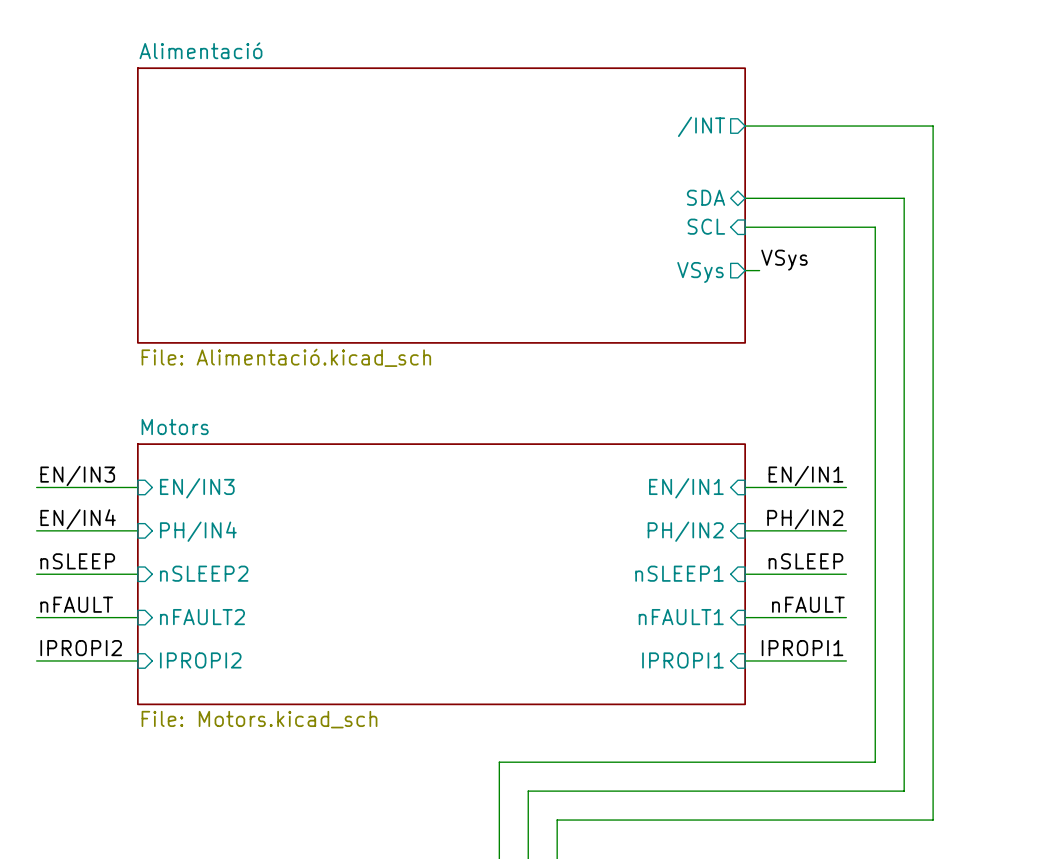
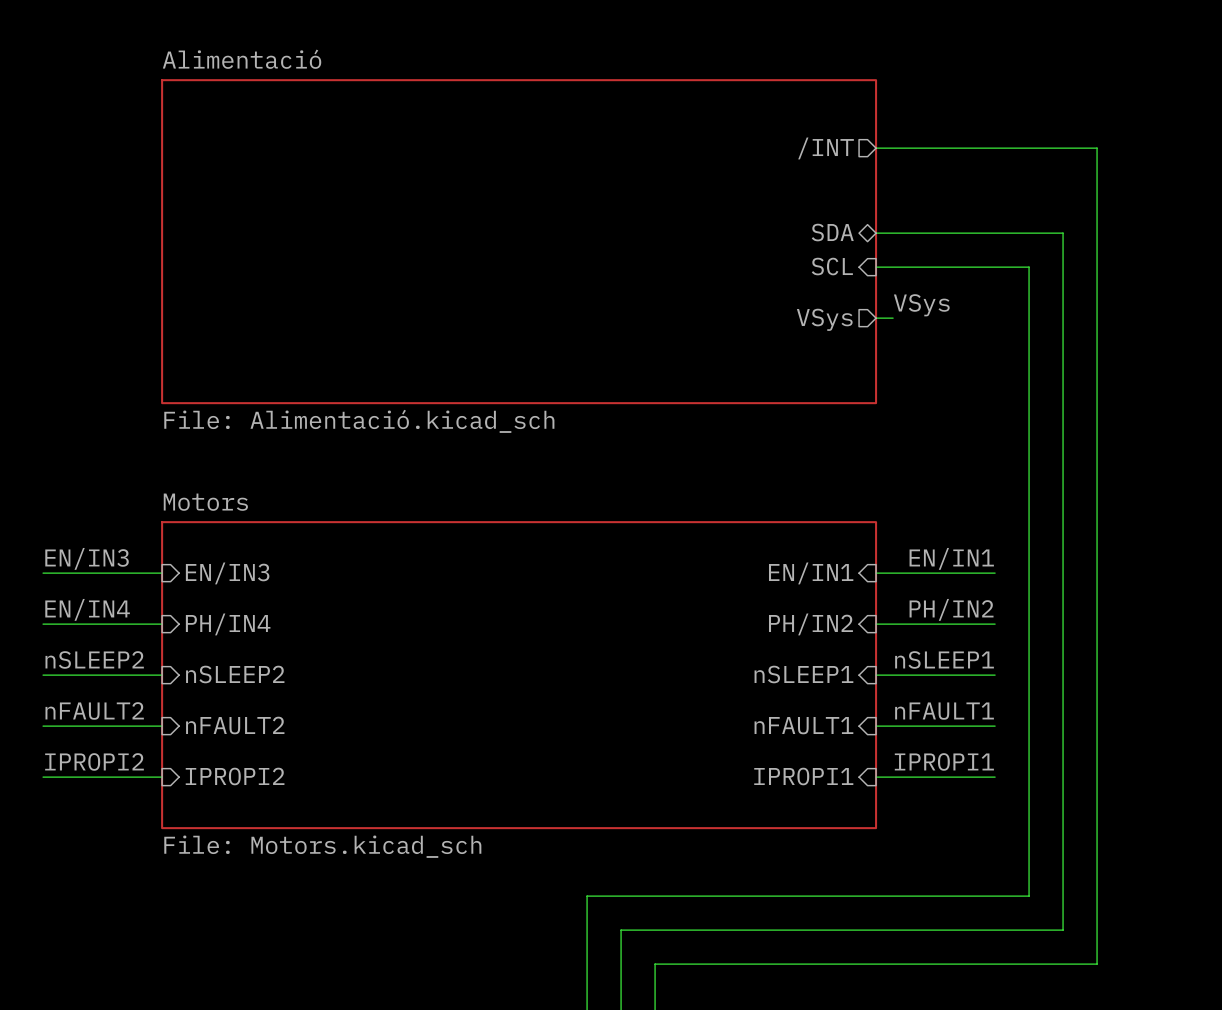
label: nSLEEP (77, 561) -> nSLEEP2 (94, 659)
label: nSLEEP (805, 561) -> nSLEEP1 (944, 659)
label: nFAULT (76, 604) -> nFAULT2 (94, 710)
label: nFAULT (808, 604) -> nFAULT1 (944, 711)

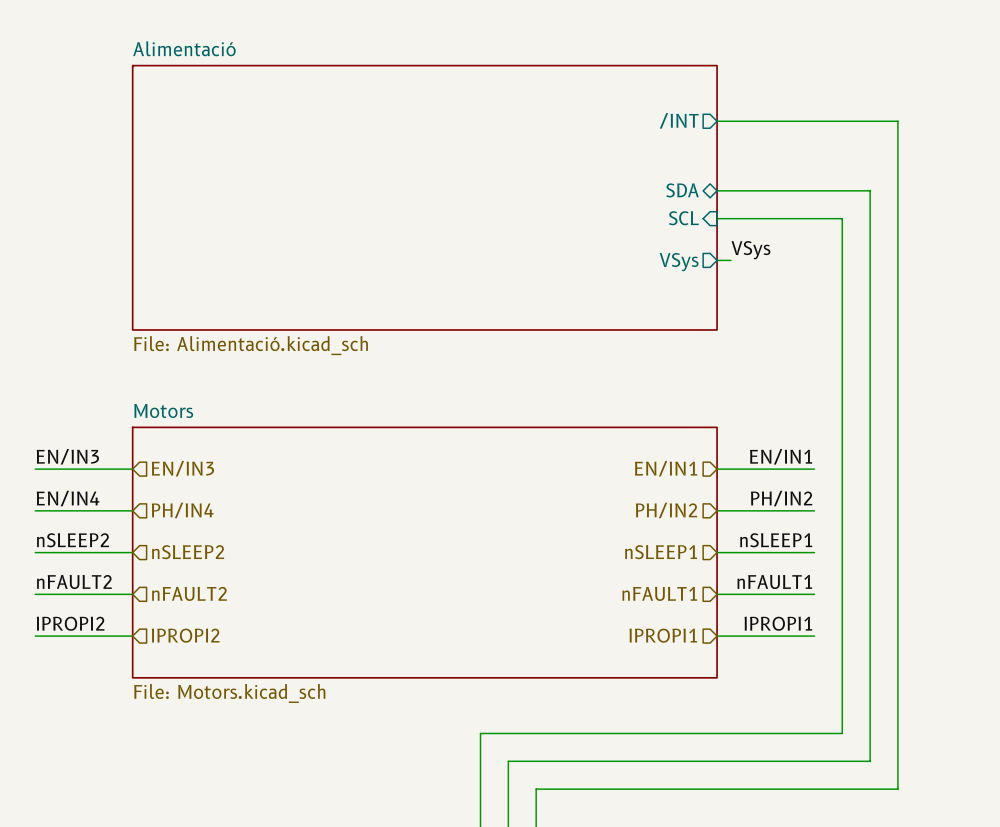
sheet pin: EN/IN3 (227, 573) -> none
hierarchical label: none -> EN/IN3 (182, 468)
sheet pin: EN/IN1 (811, 573) -> none
hierarchical label: none -> EN/IN1 (666, 468)
sheet pin: PH/IN4 (228, 624) -> none
hierarchical label: none -> PH/IN4 (182, 510)
sheet pin: PH/IN2 (810, 624) -> none
hierarchical label: none -> PH/IN2 (666, 510)
sheet pin: nSLEEP2 (235, 674) -> none
hierarchical label: none -> nSLEEP2 (188, 552)
sheet pin: nSLEEP1 (803, 674) -> none
hierarchical label: none -> nSLEEP1 (661, 552)
sheet pin: nFAULT2 (235, 725) -> none
hierarchical label: none -> nFAULT2 (189, 593)
sheet pin: nFAULT1 (803, 725) -> none
hierarchical label: none -> nFAULT1 (659, 593)
sheet pin: IPROPI2 (235, 776) -> none
hierarchical label: none -> IPROPI2 (185, 635)
sheet pin: IPROPI1 (803, 776) -> none
hierarchical label: none -> IPROPI1 (663, 635)

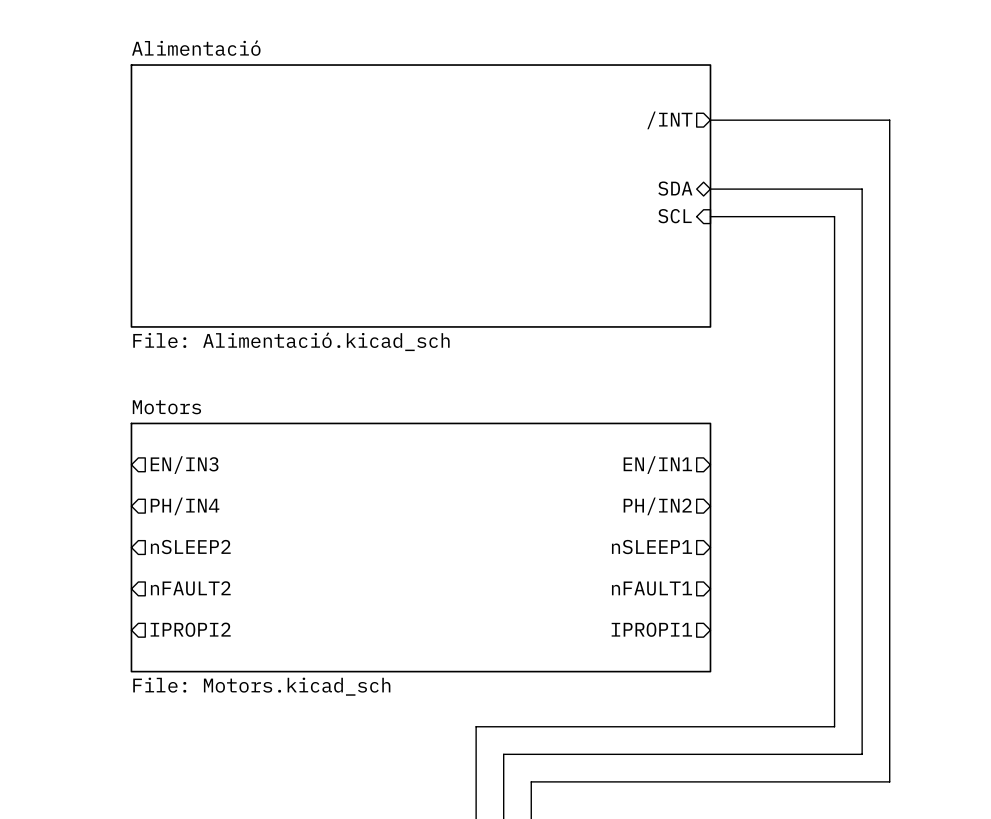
label: VSys (750, 250) -> none
wire: (717, 260) (730, 260) -> none
sheet pin: VSys (679, 262) -> none
label: EN/IN3 (67, 456) -> none
label: EN/IN1 (781, 456) -> none
wire: (35, 469) (132, 469) -> none
wire: (717, 469) (814, 469) -> none
label: EN/IN4 (68, 498) -> none
label: PH/IN2 (781, 498) -> none
wire: (35, 510) (132, 510) -> none
wire: (717, 510) (814, 510) -> none
label: nSLEEP2 (73, 540) -> none
label: nSLEEP1 (776, 540) -> none
wire: (35, 552) (132, 552) -> none
wire: (717, 552) (814, 552) -> none
label: nFAULT2 (74, 582) -> none
label: nFAULT1 (774, 582) -> none
wire: (35, 594) (132, 594) -> none
wire: (717, 594) (814, 594) -> none
label: IPROPI2 (70, 623) -> none
label: IPROPI1 (778, 623) -> none
wire: (35, 636) (132, 636) -> none
wire: (717, 636) (814, 636) -> none

